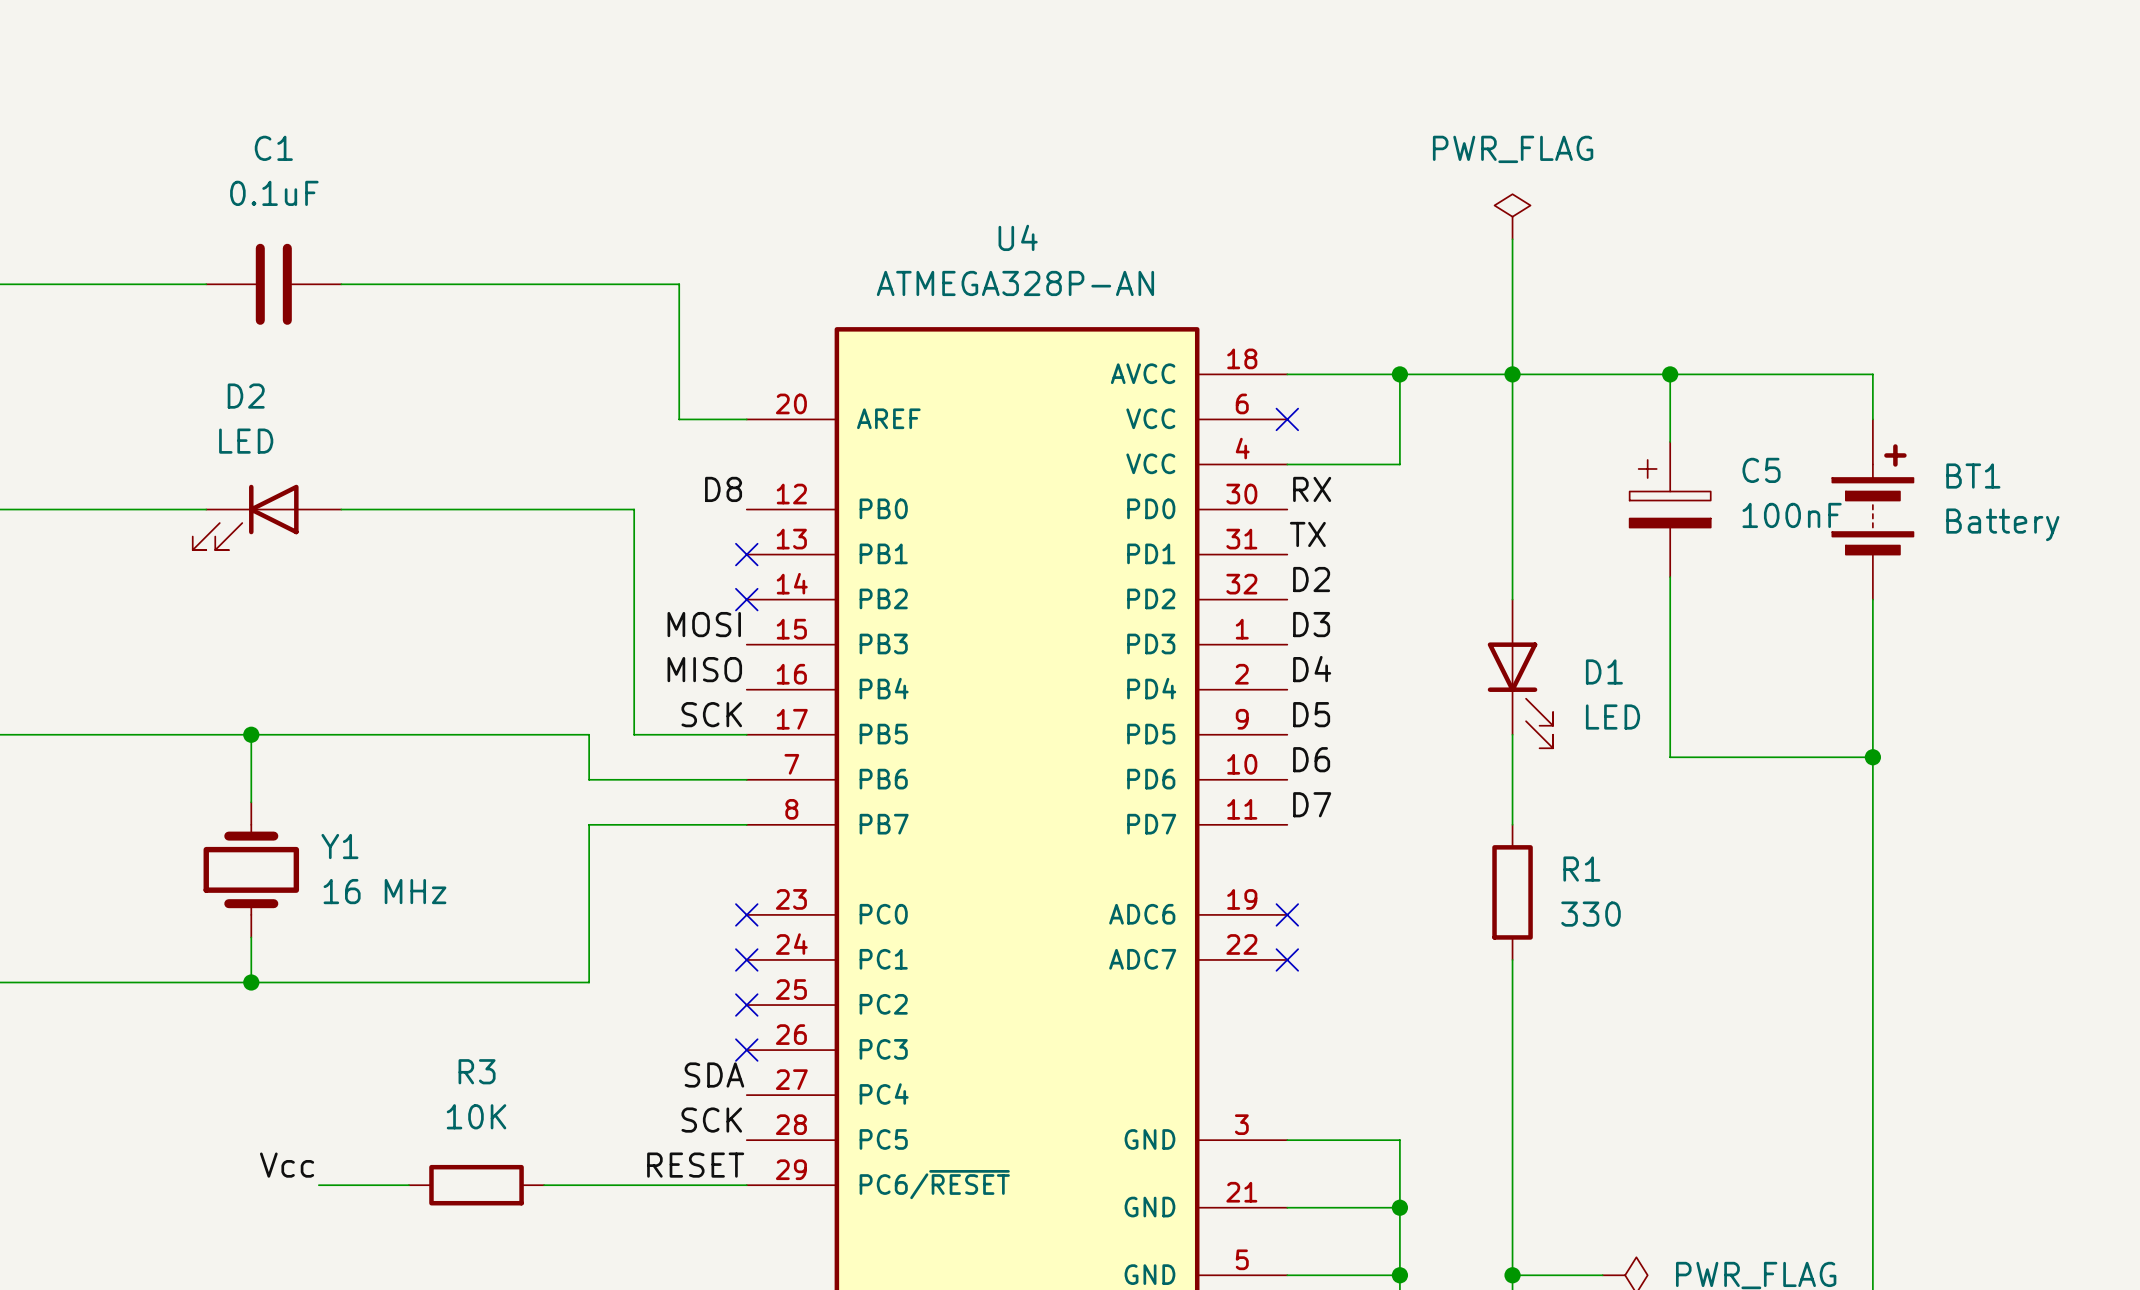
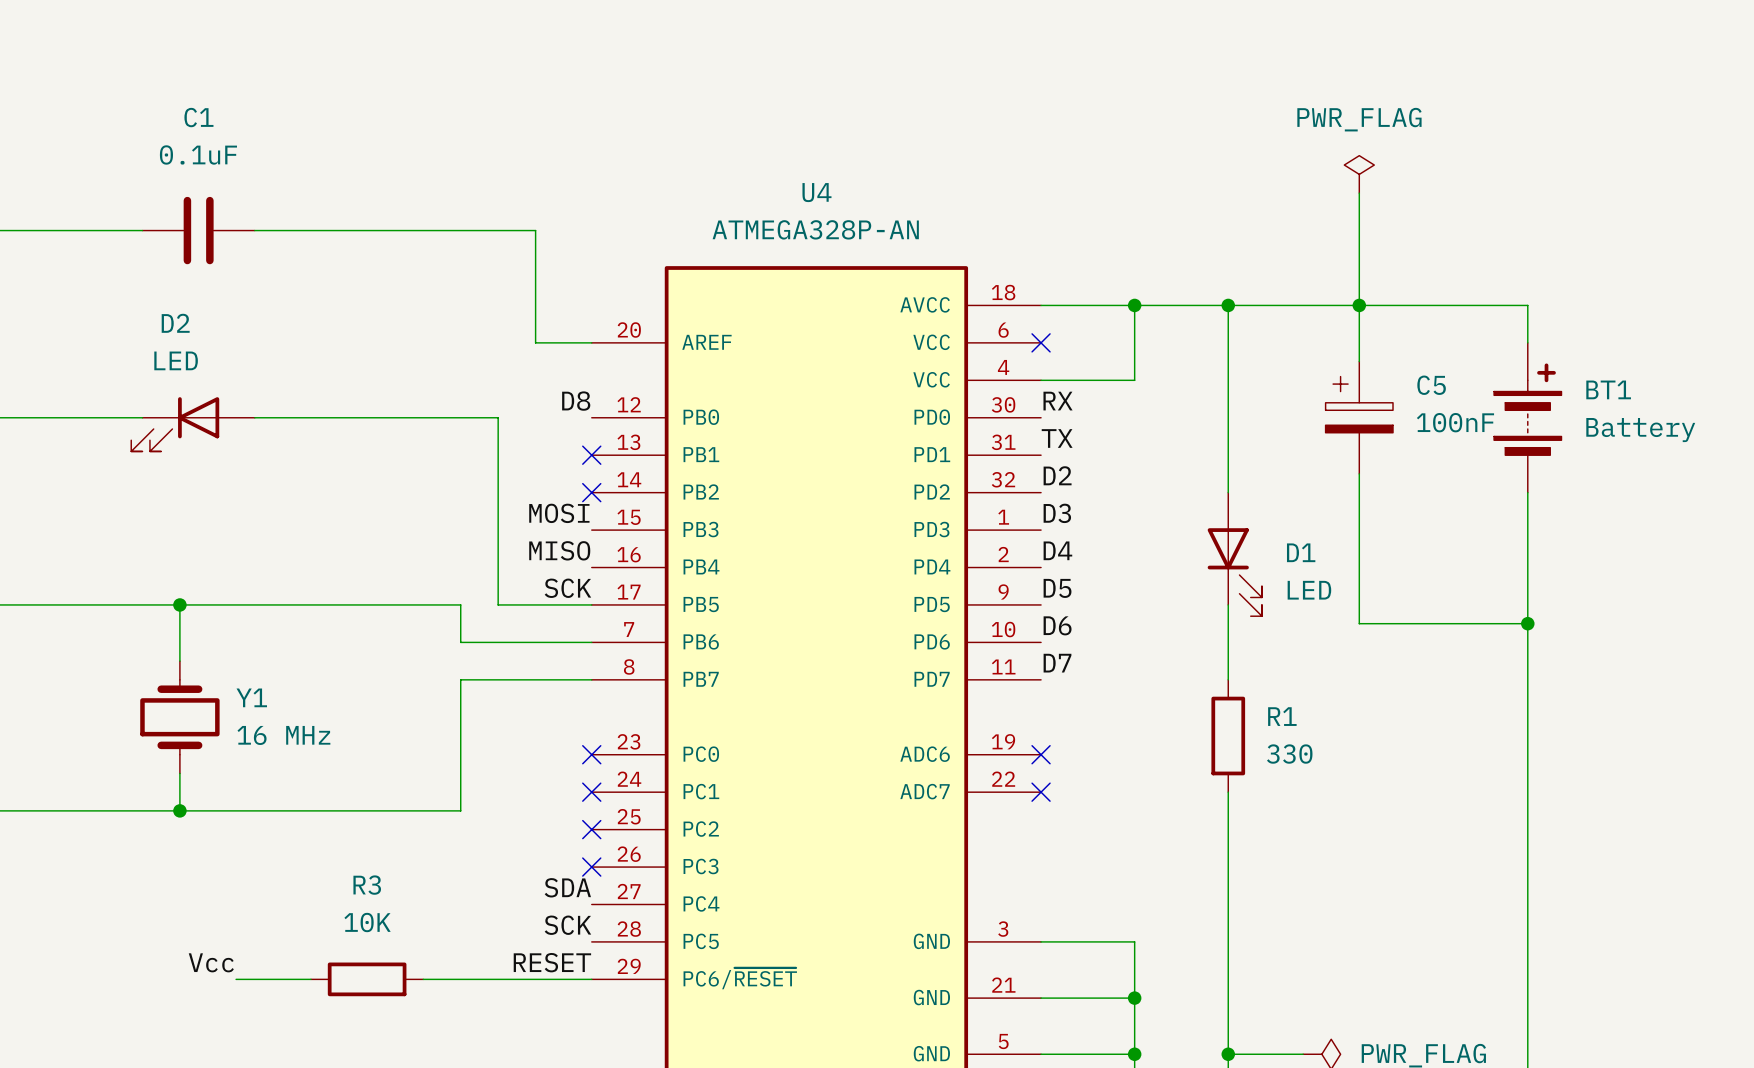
power symbol position: PWR_FLAG (1512, 216) -> PWR_FLAG (1359, 174)
wire: (1512, 239) (1512, 374) -> (1359, 193) (1359, 305)

